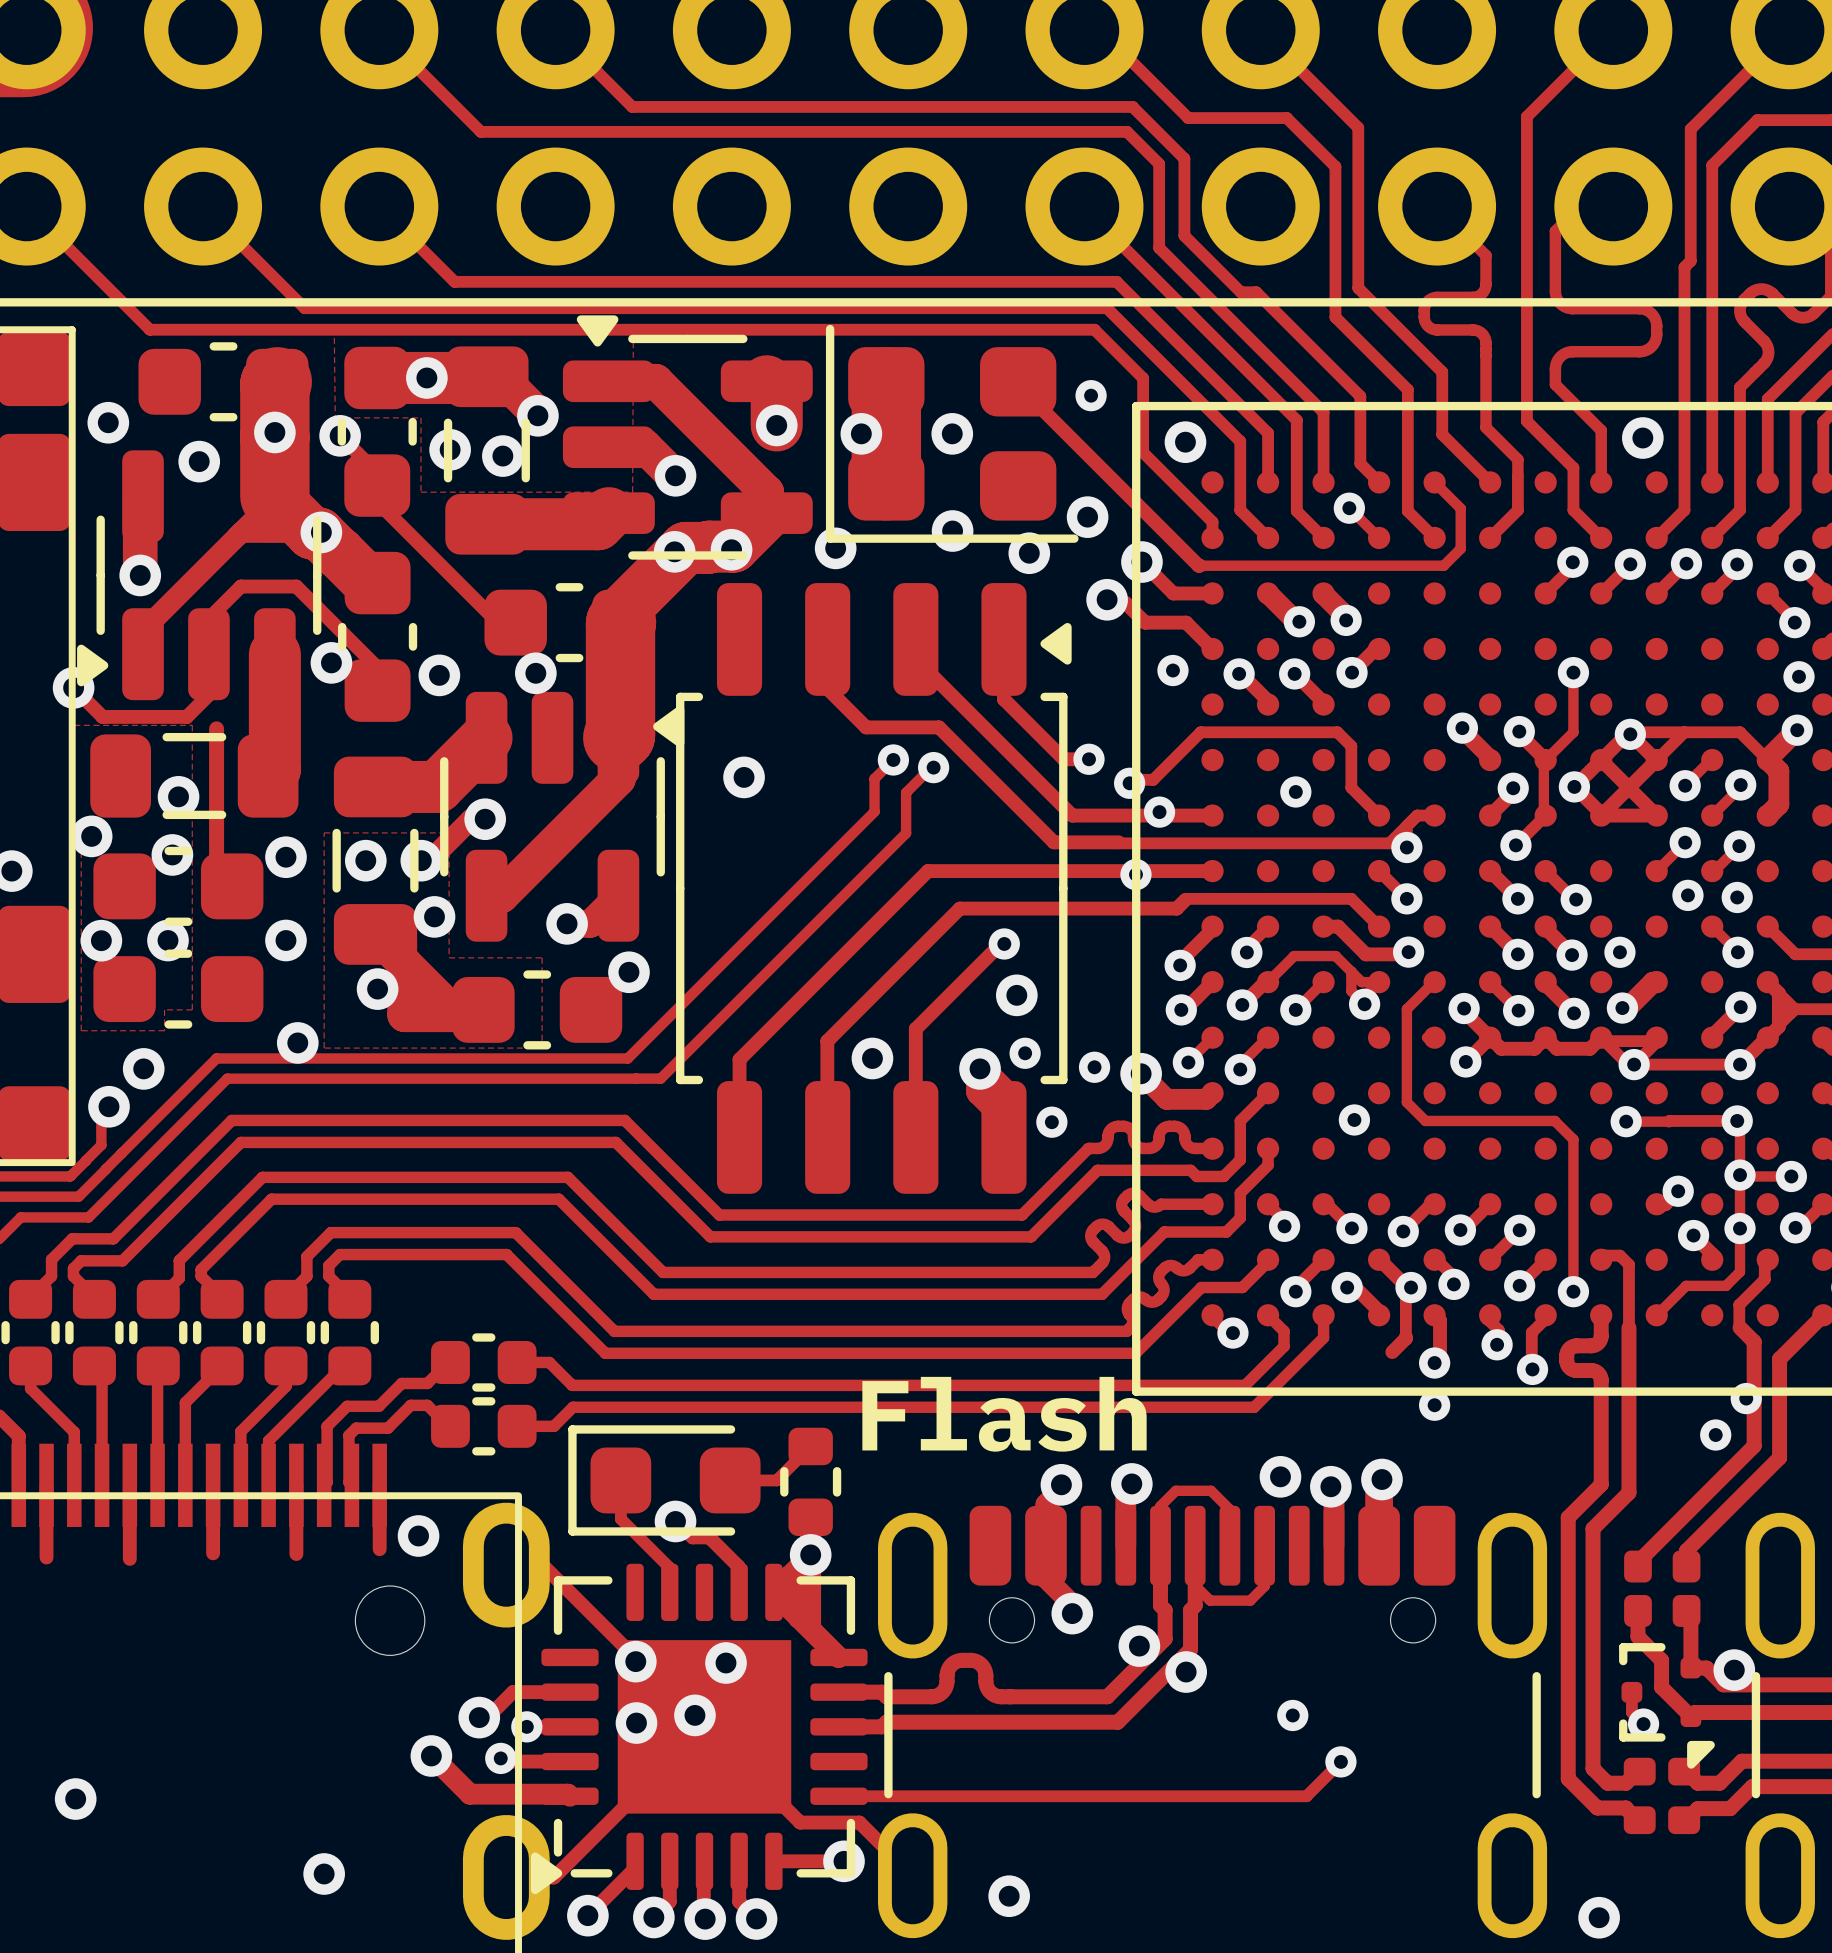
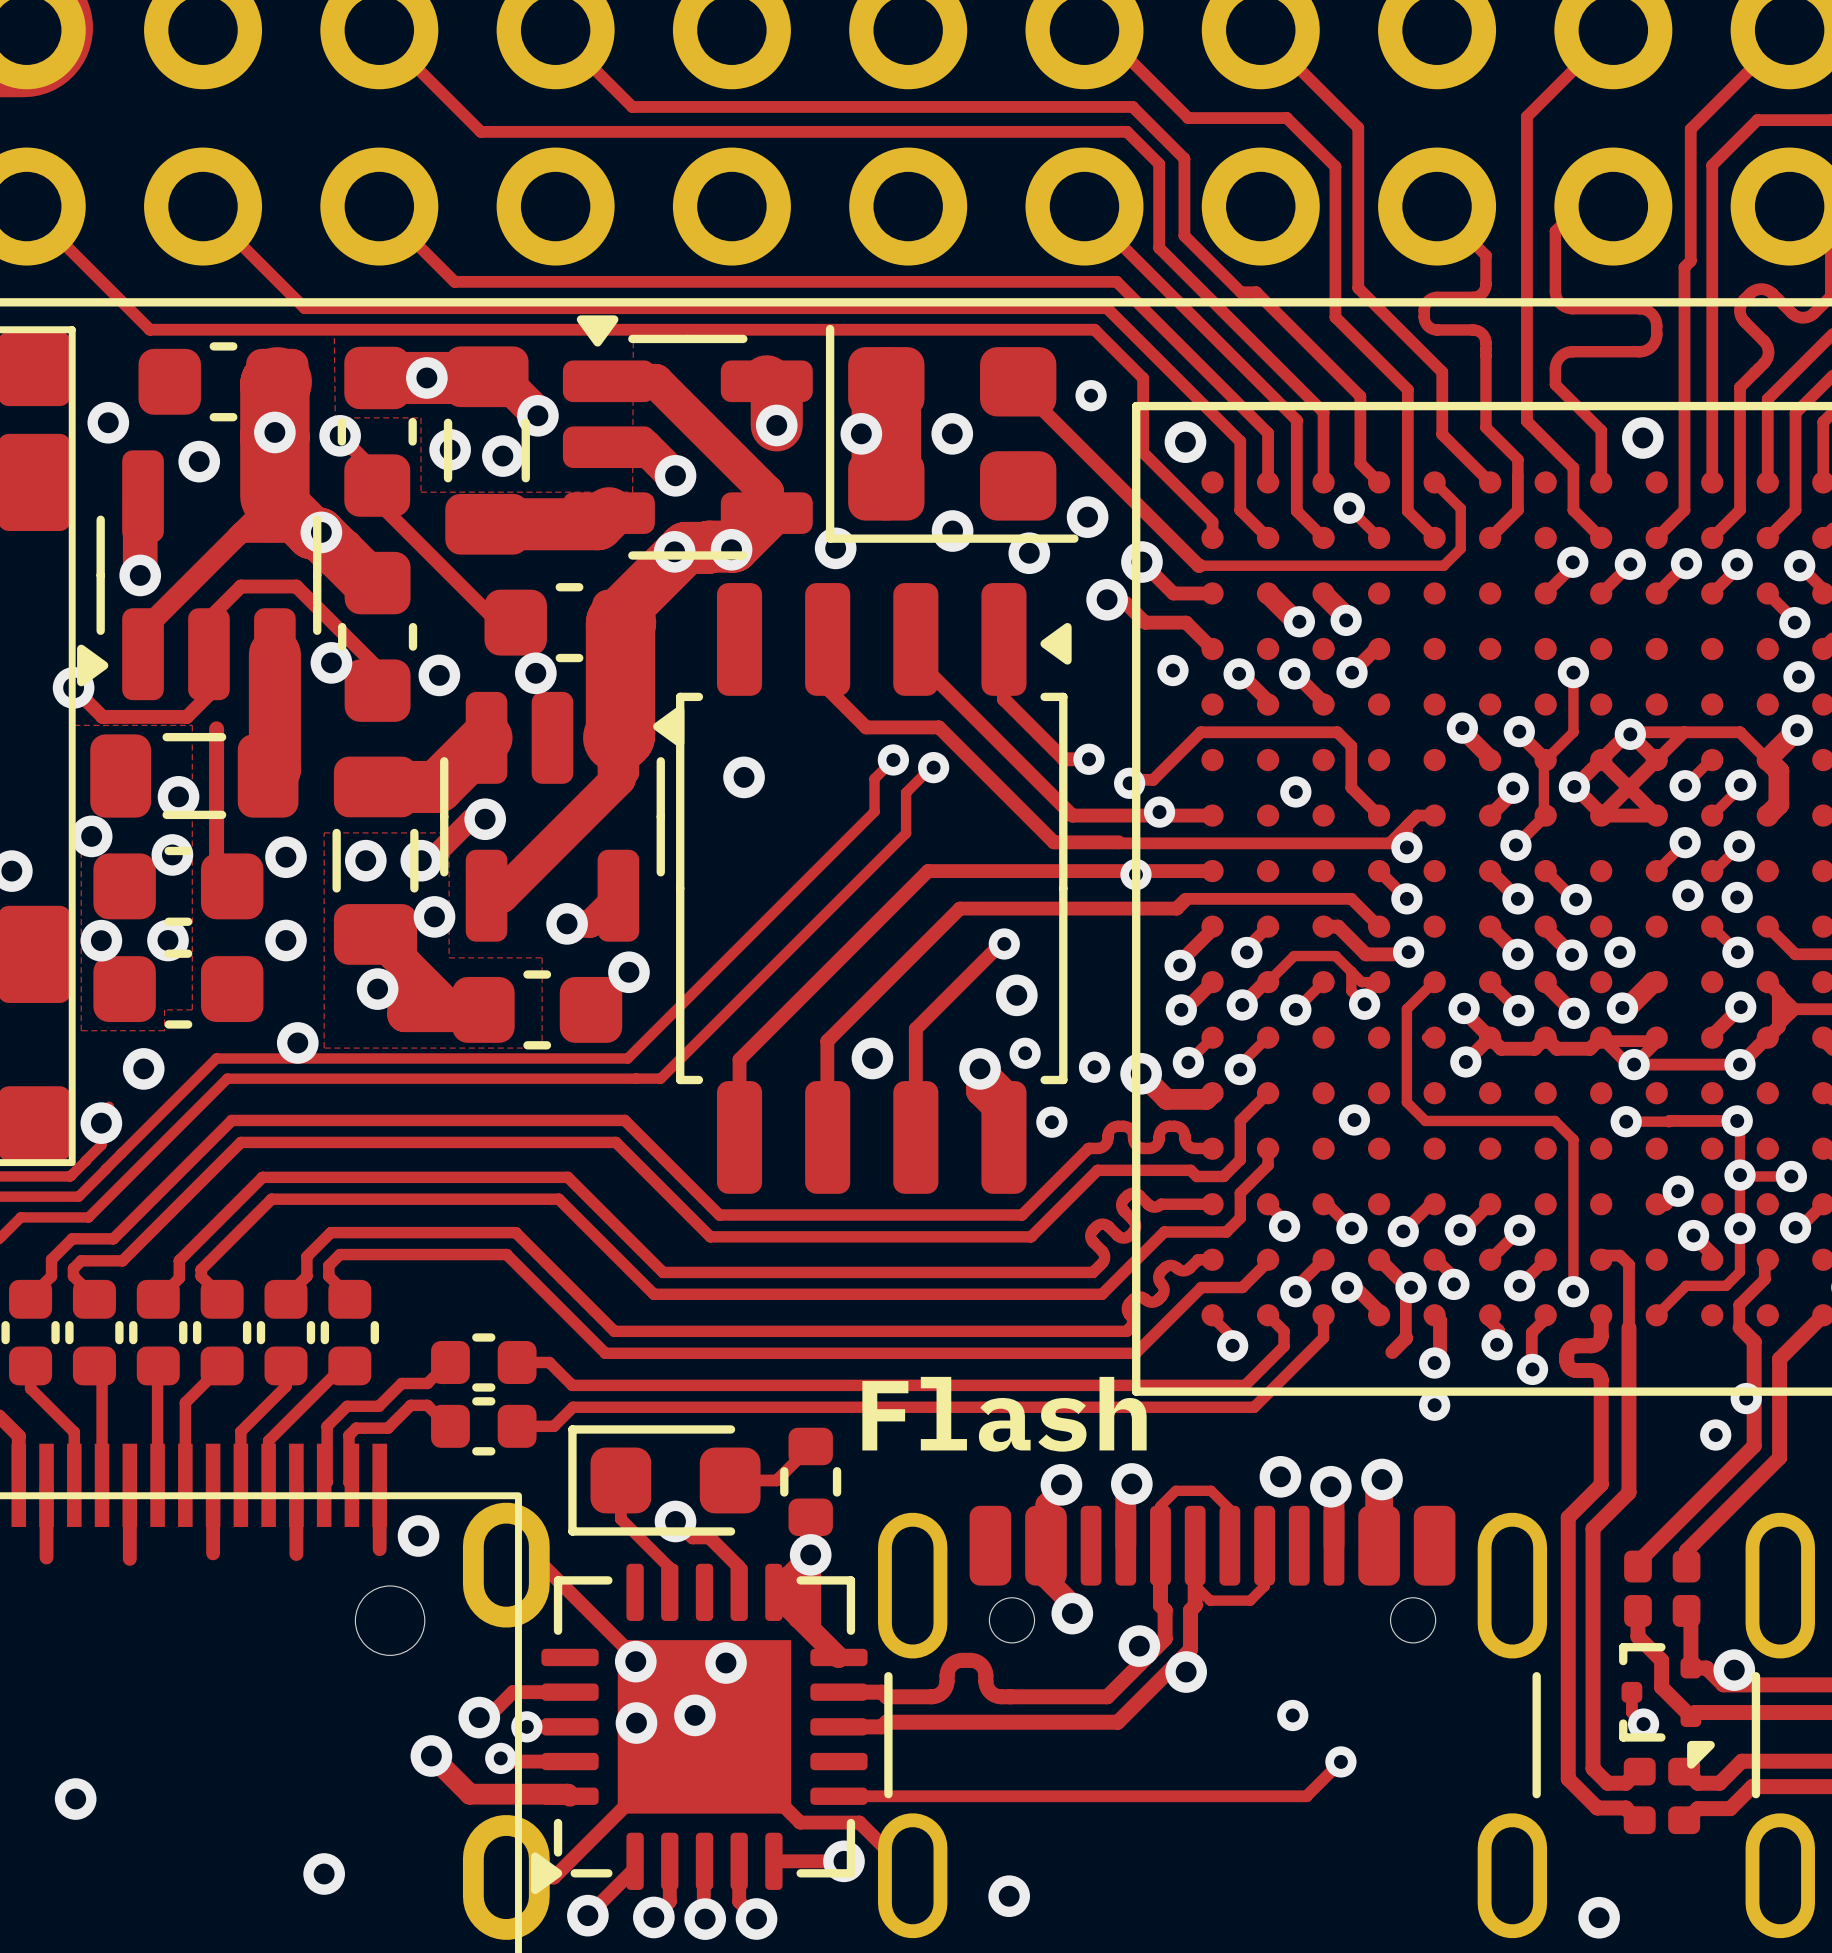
via position: (109, 1106) -> (101, 1123)
via position: (1232, 1333) -> (1232, 1345)

